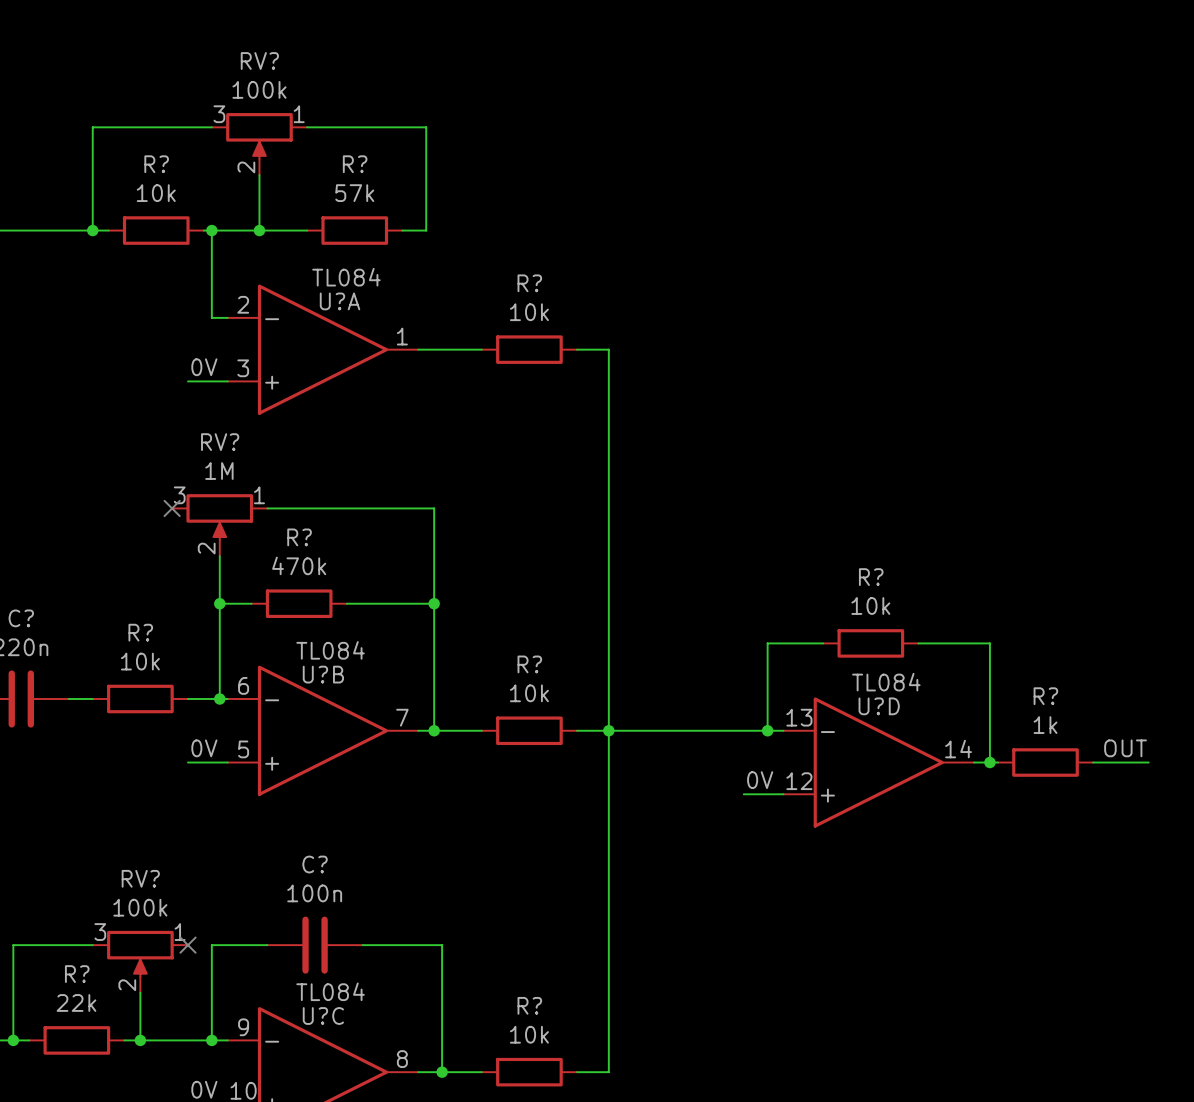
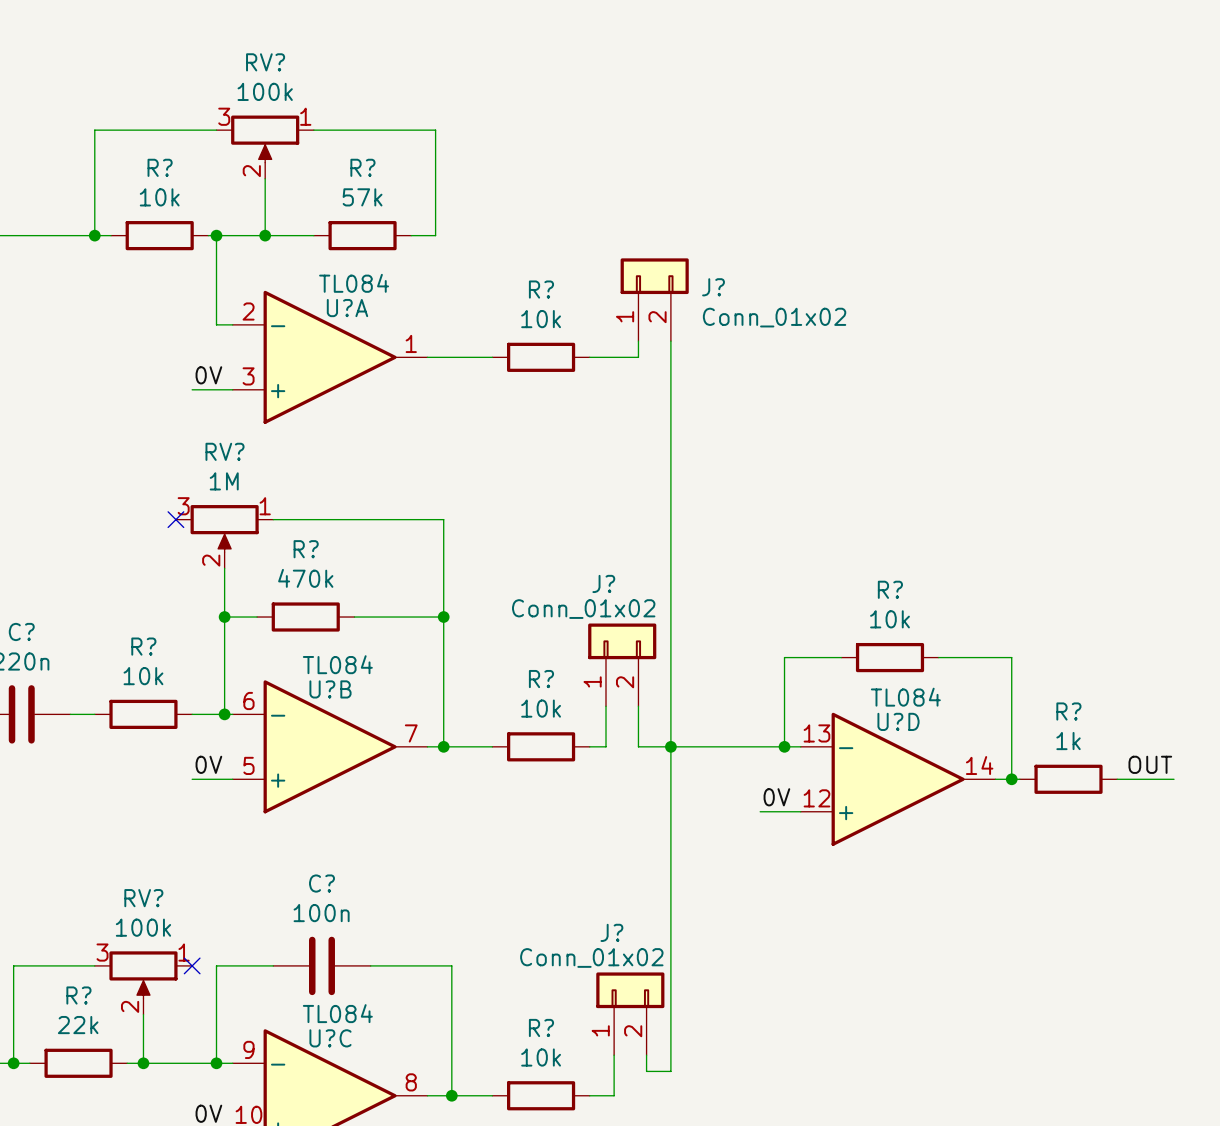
J?: none -> Conn_01x02 (654, 299)
wire: none -> (638, 341) (638, 357) (622, 357)
wire: none -> (670, 341) (670, 1071) (646, 1071) (646, 1055)
wire: (608, 349) (608, 1072) (600, 1072) -> (614, 1055) (614, 1095)
J?: none -> Conn_01x02 (622, 664)
wire: none -> (638, 706) (638, 746)
wire: (592, 730) (624, 730) -> (605, 746) (605, 706)
junction position: (608, 730) -> (670, 746)
J?: none -> Conn_01x02 (630, 1013)

